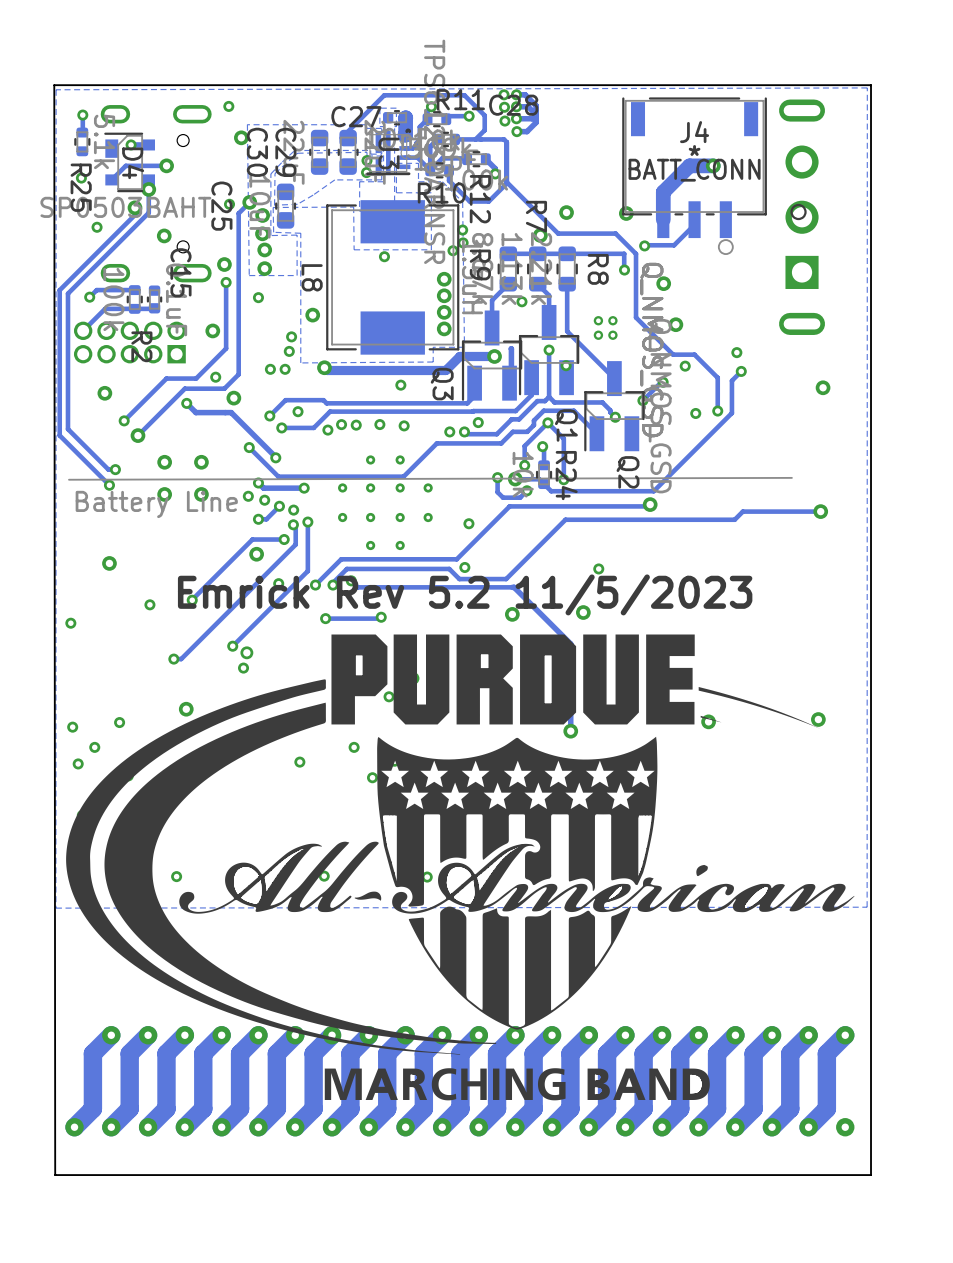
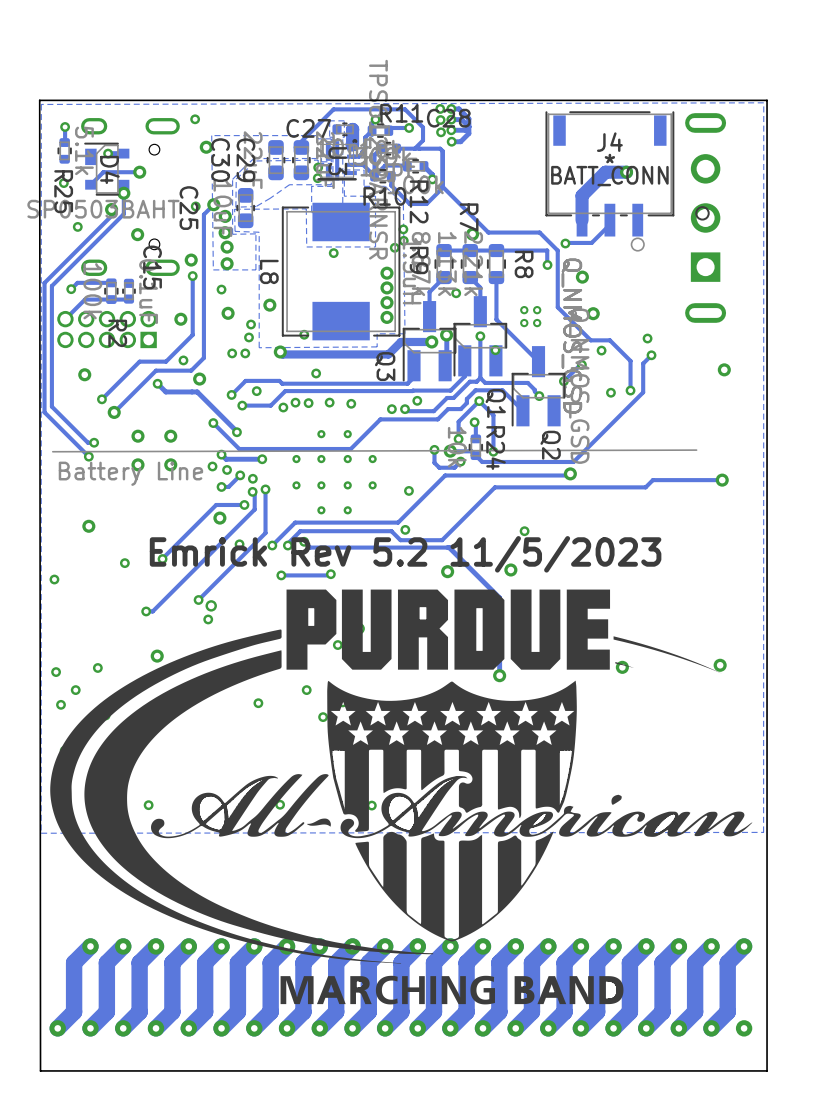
via: (566, 212) -> none
via: (626, 213) -> none
via: none -> (228, 313)
via: none -> (304, 334)
via: none -> (446, 335)
via: (400, 385) -> none
via: none -> (316, 373)

